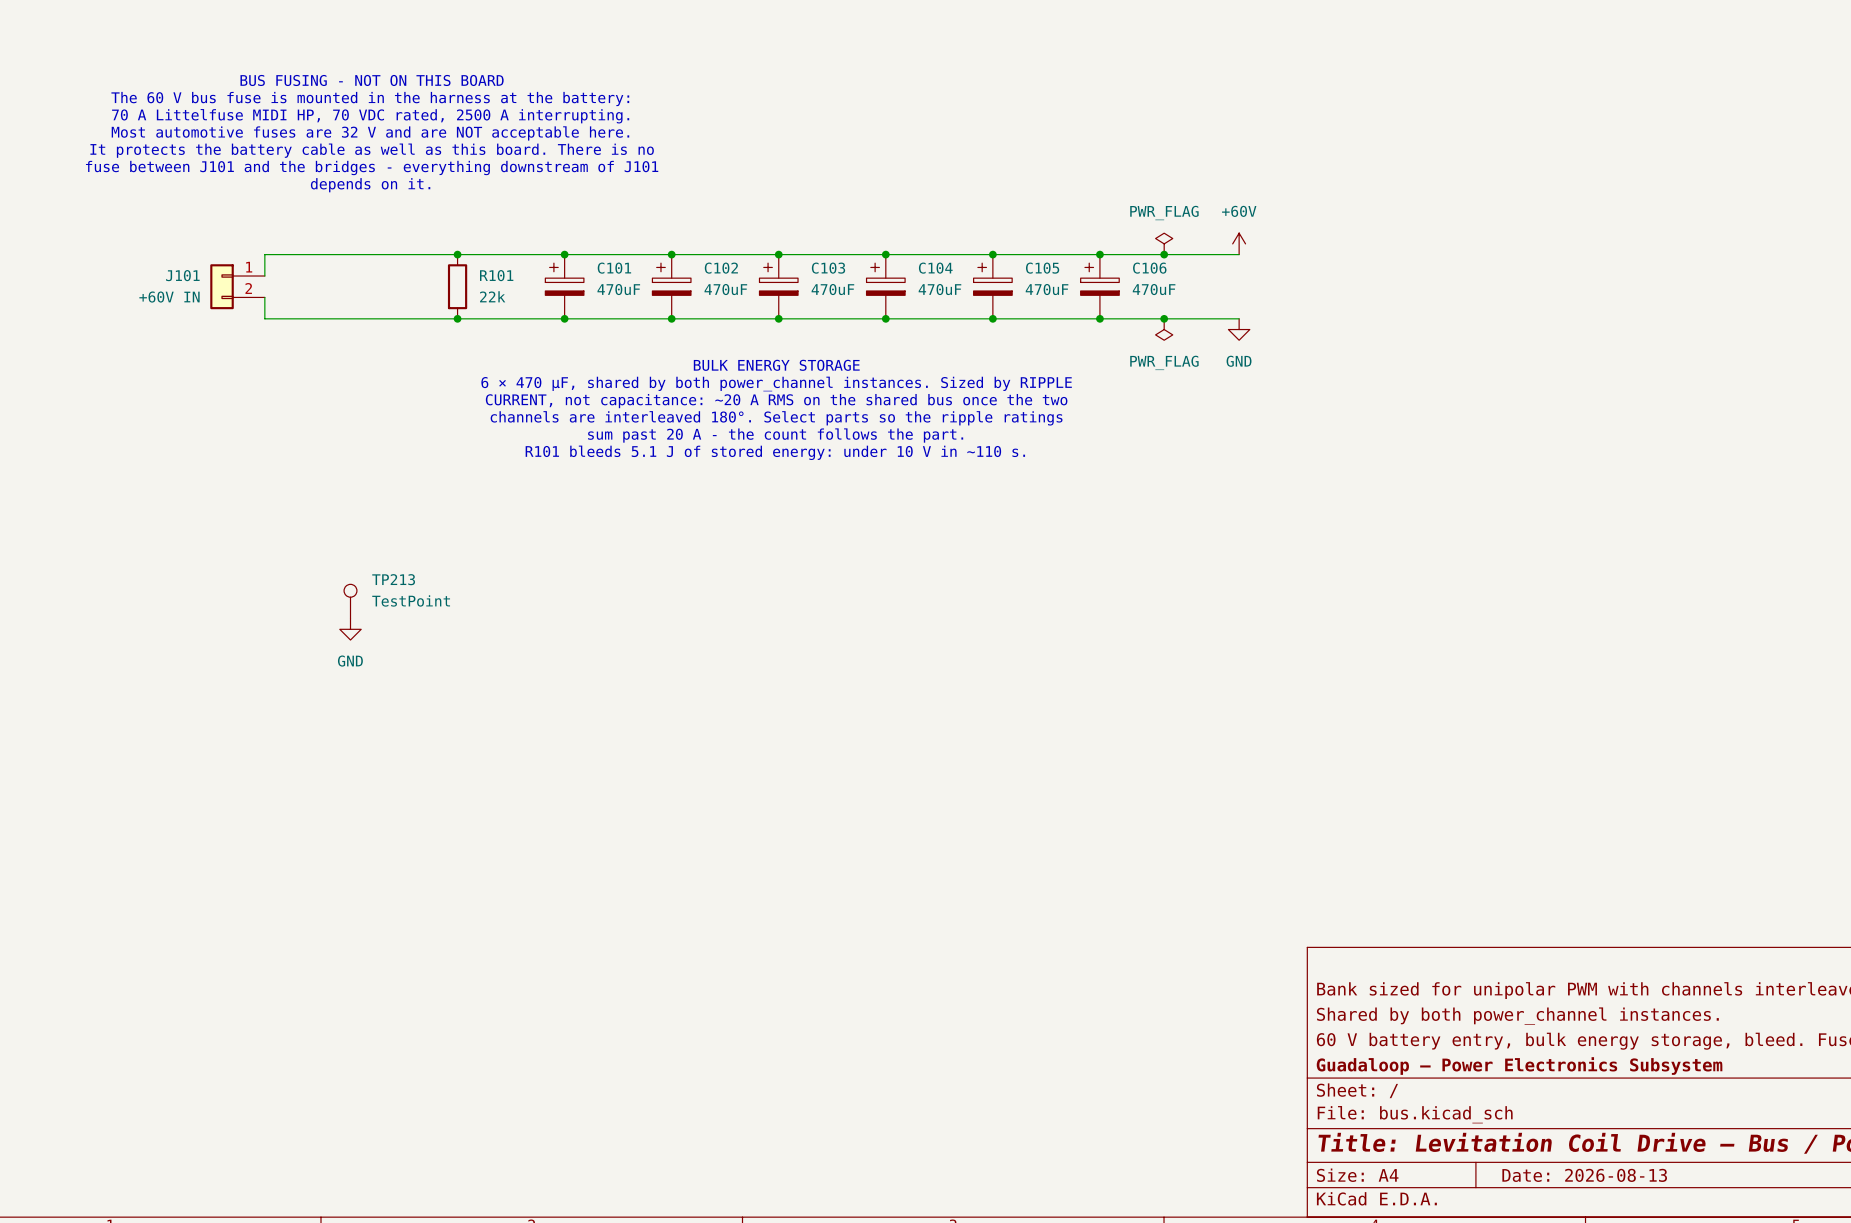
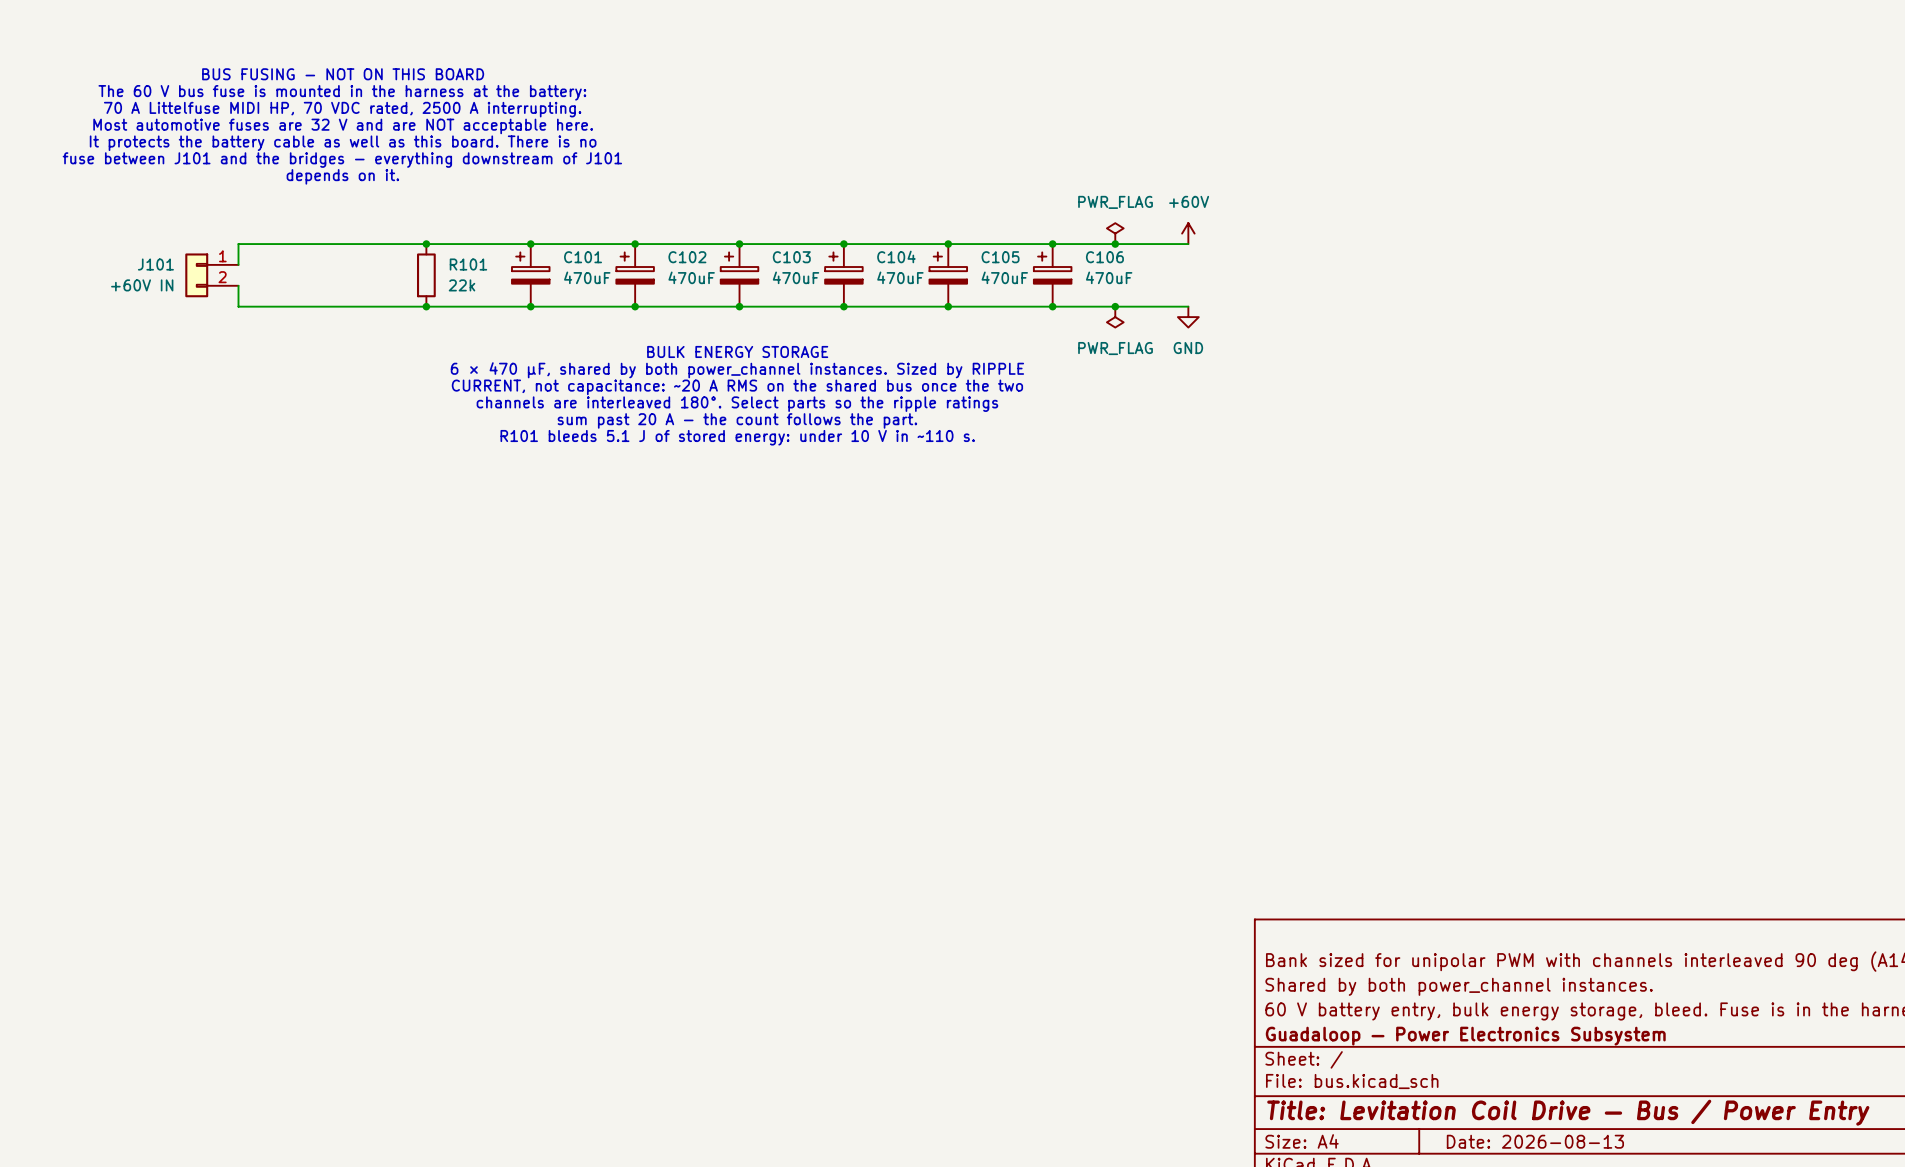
TP213: TestPoint (350, 601) -> none
power symbol: GND (350, 629) -> none

